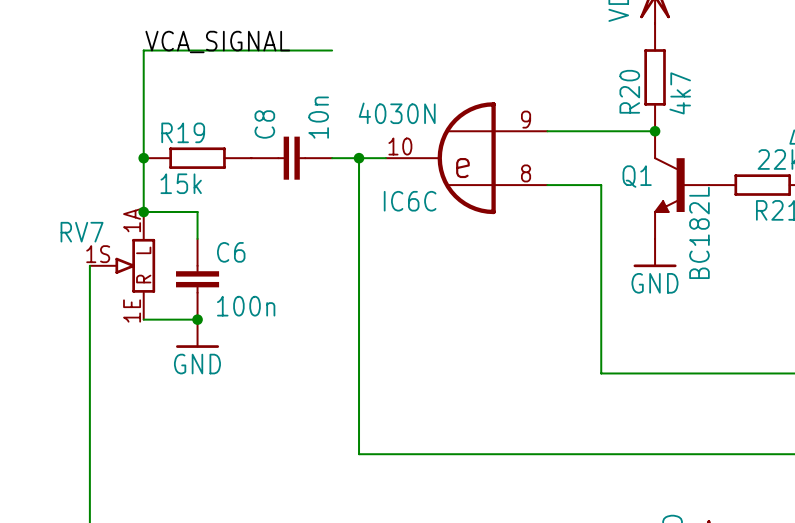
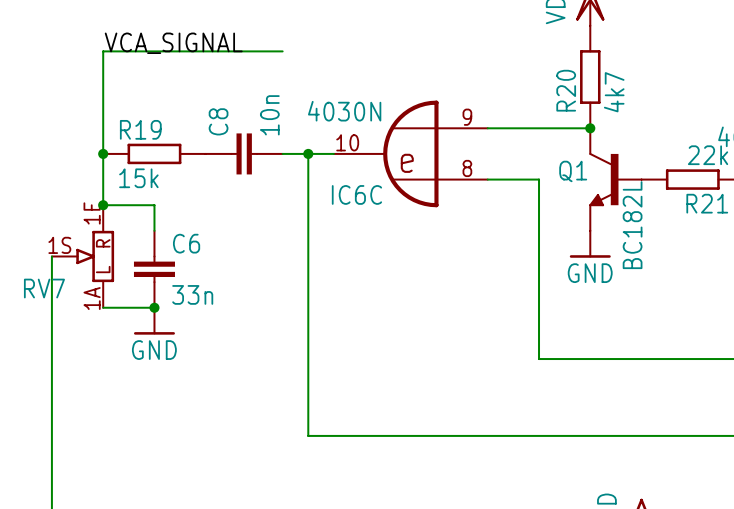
RV7 flip: as is (135, 265) -> up-down (95, 256)
C6 value: 100n (246, 306) -> 33n (192, 294)

